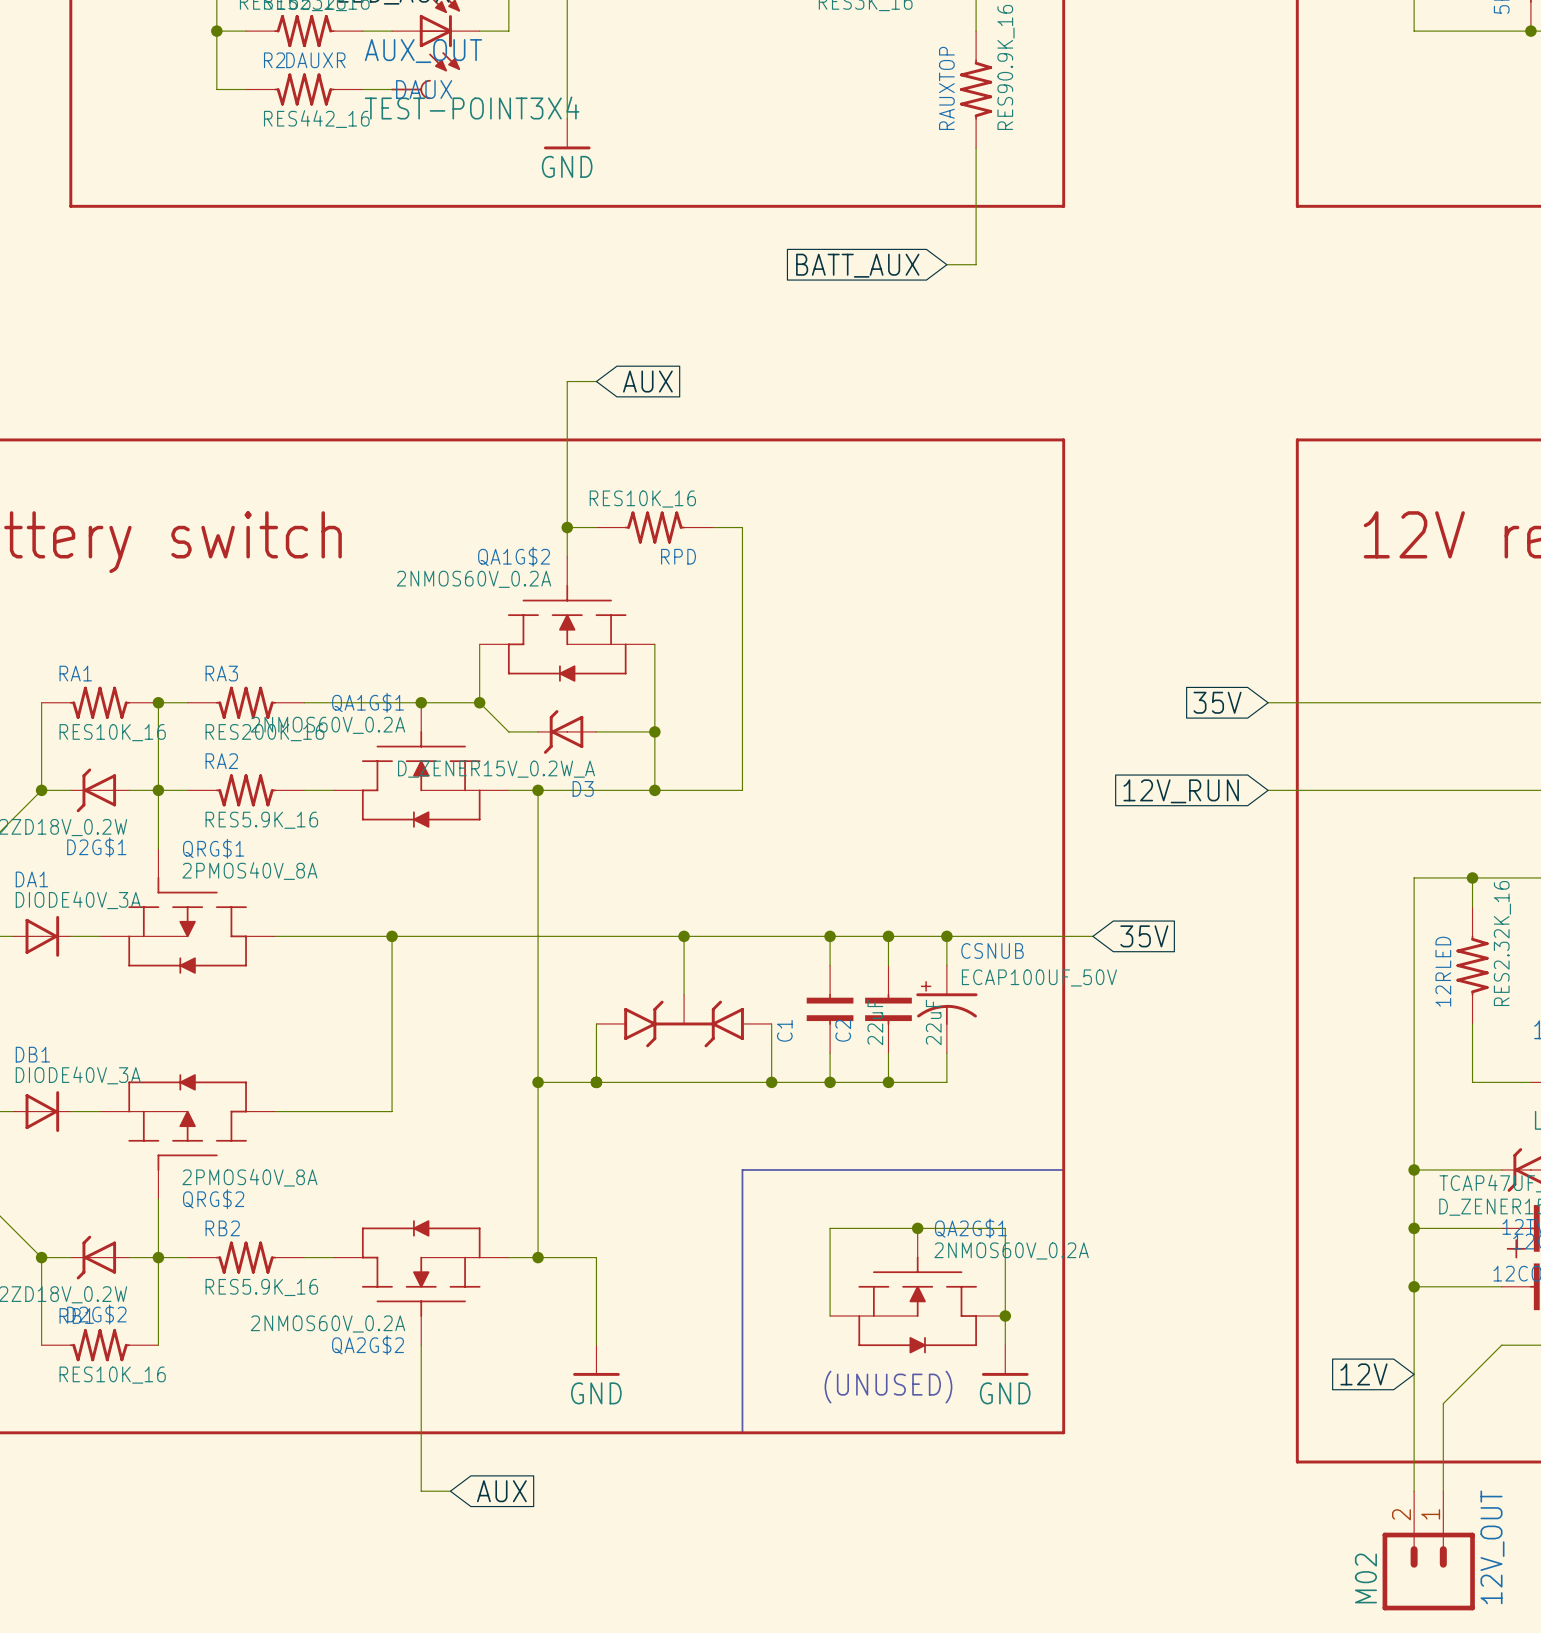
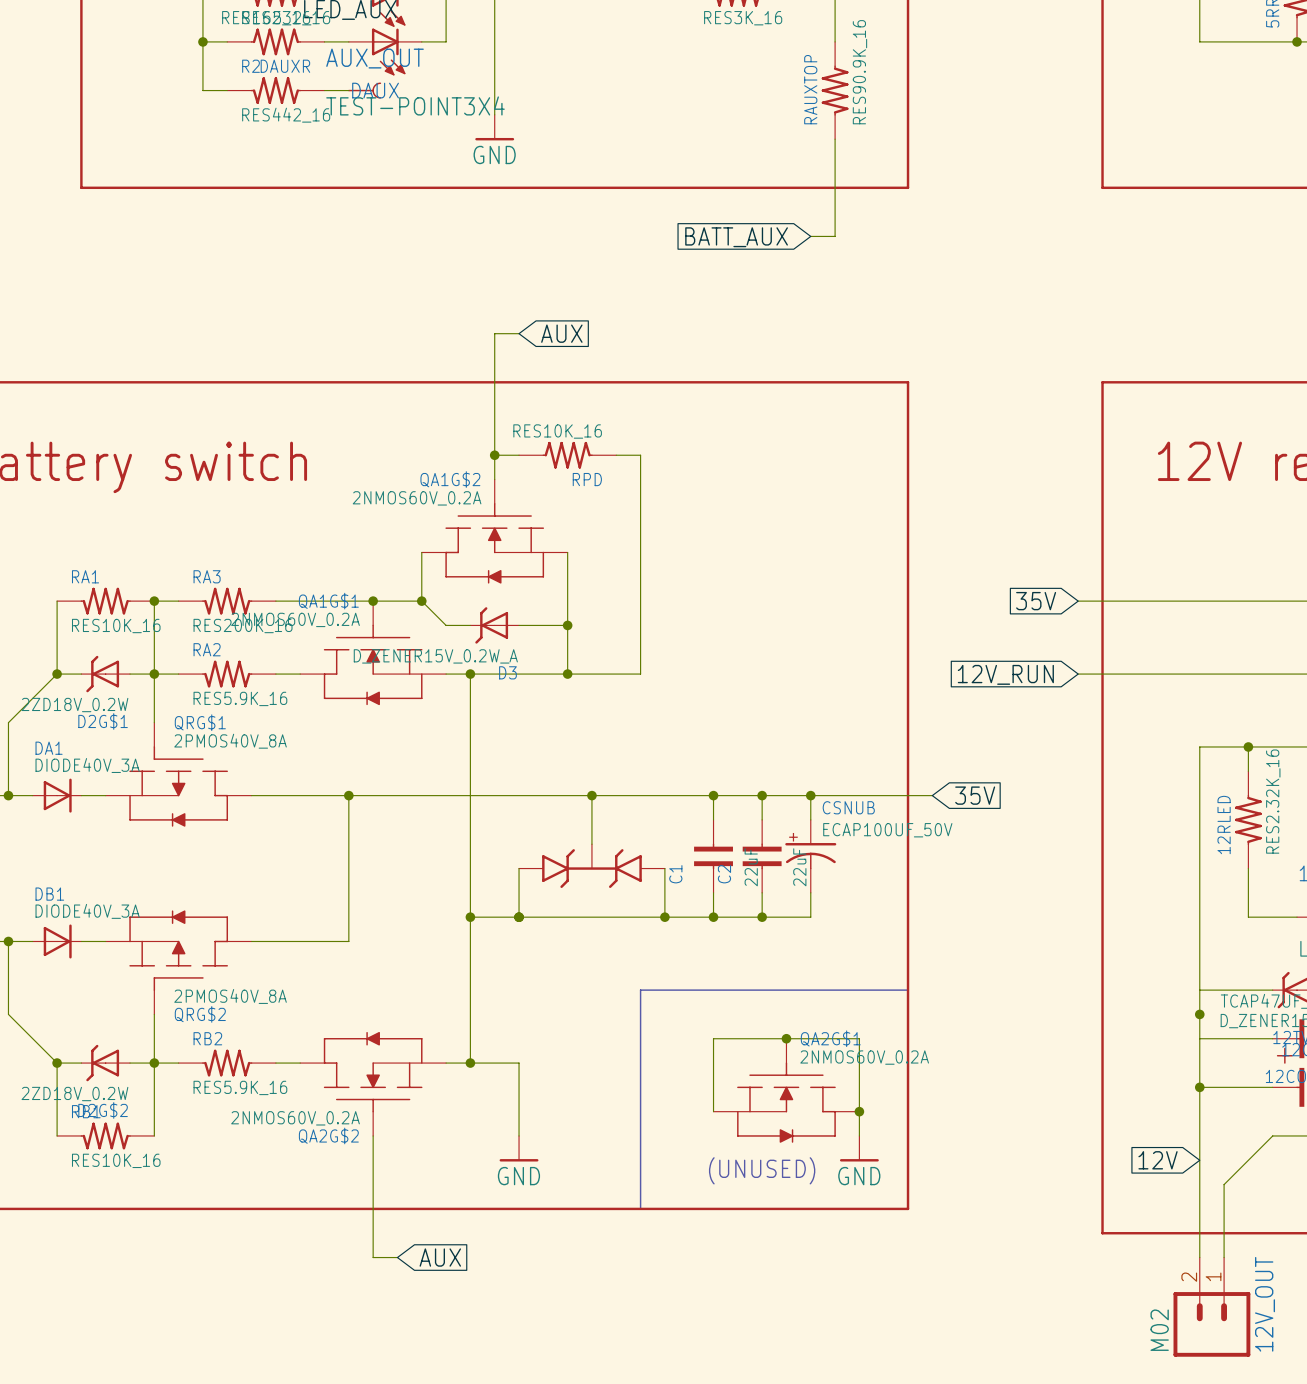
junction: (1414, 1169) -> none
junction: none -> (1199, 1014)
junction: (1414, 1228) -> none

